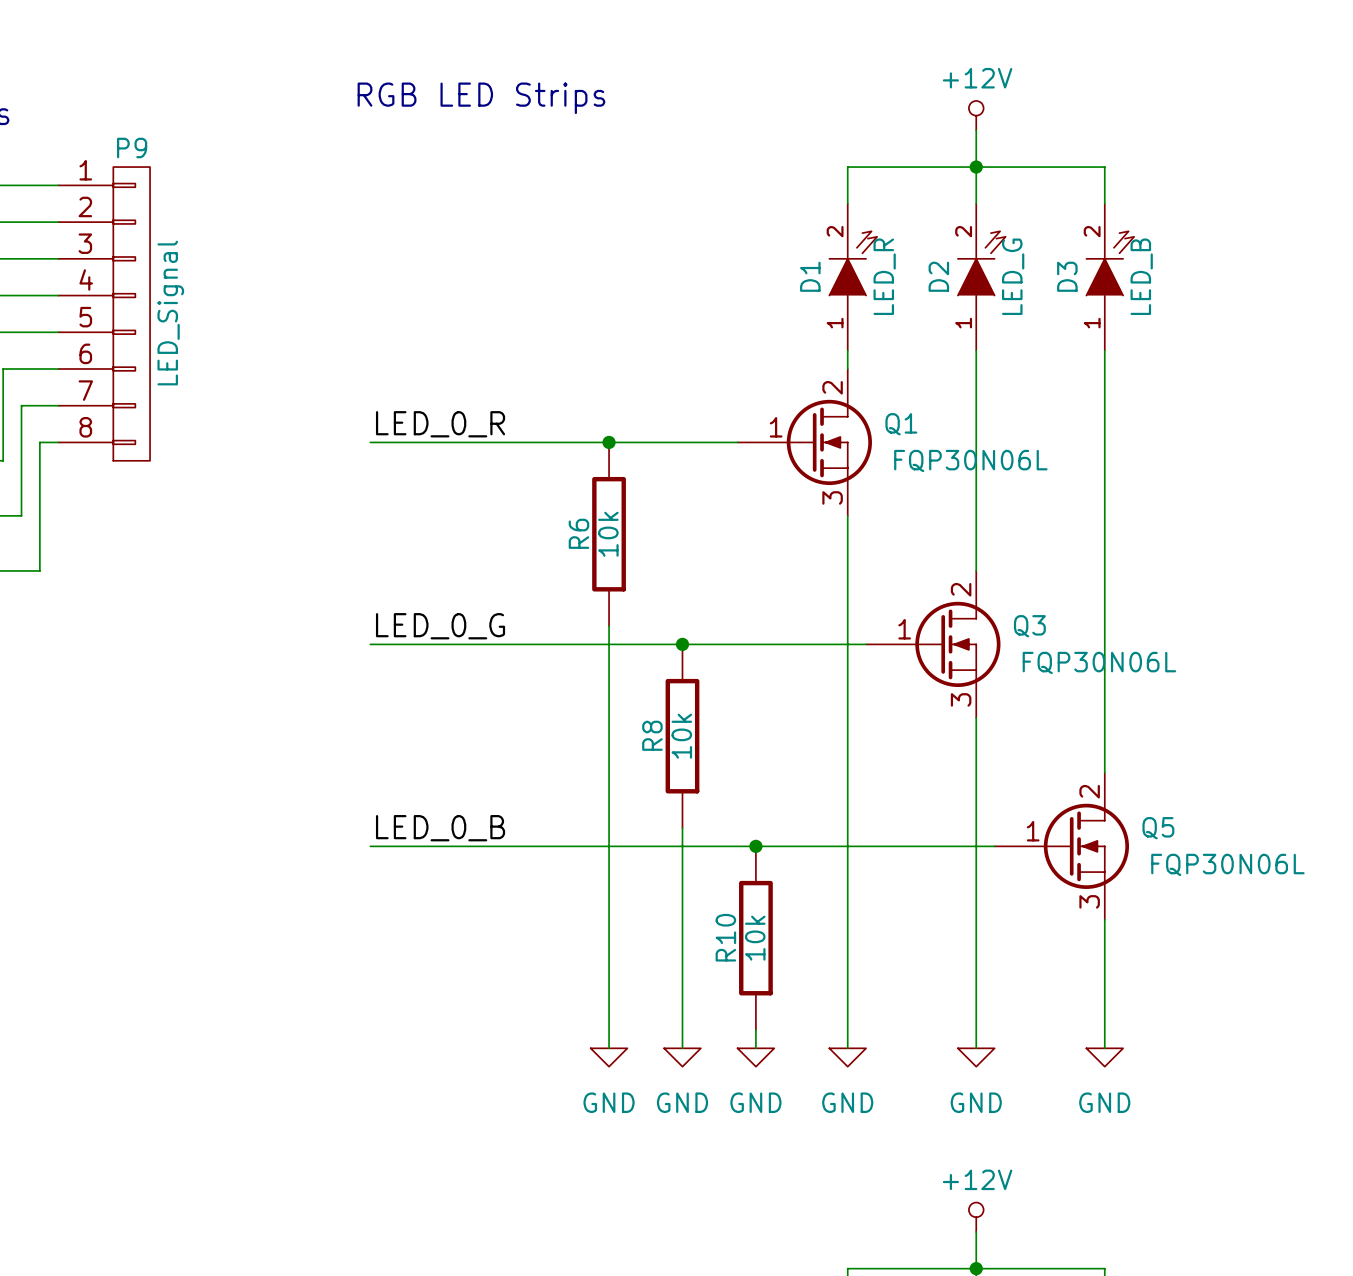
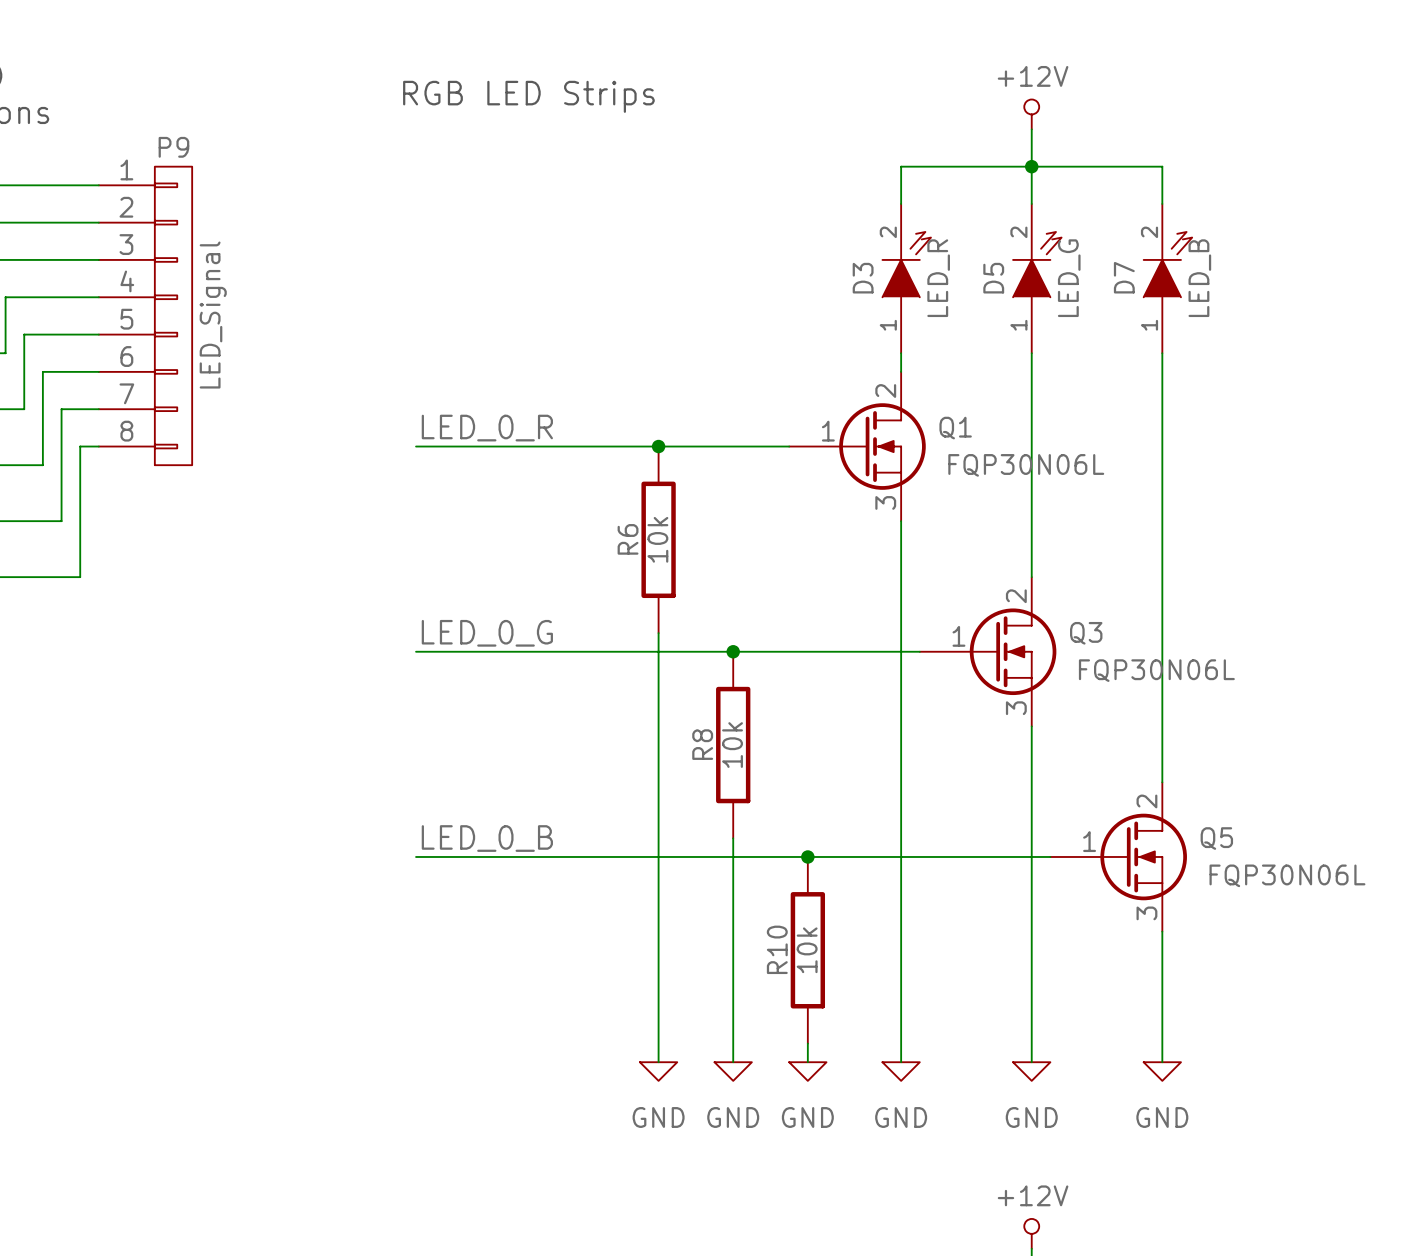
D1 name: D1 (810, 276) -> D3 (863, 278)
D2 name: D2 (938, 276) -> D5 (993, 278)
D3 name: D3 (1067, 276) -> D7 (1124, 277)

